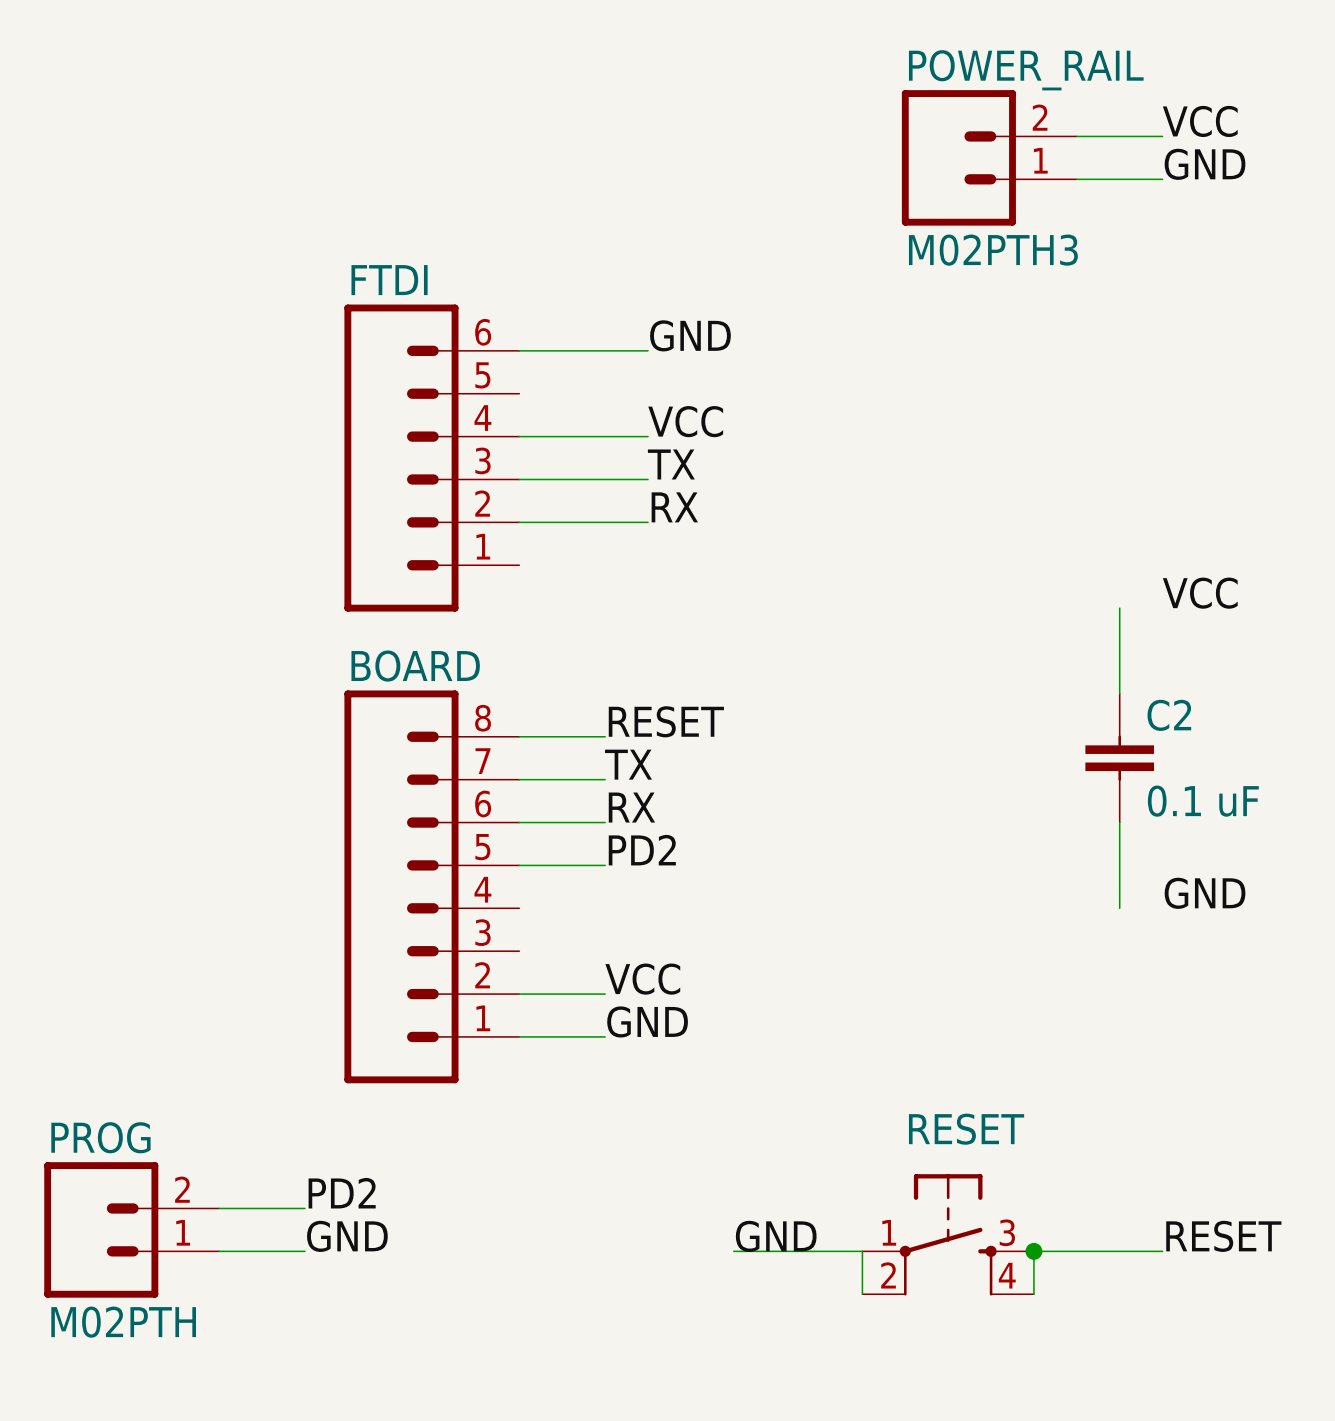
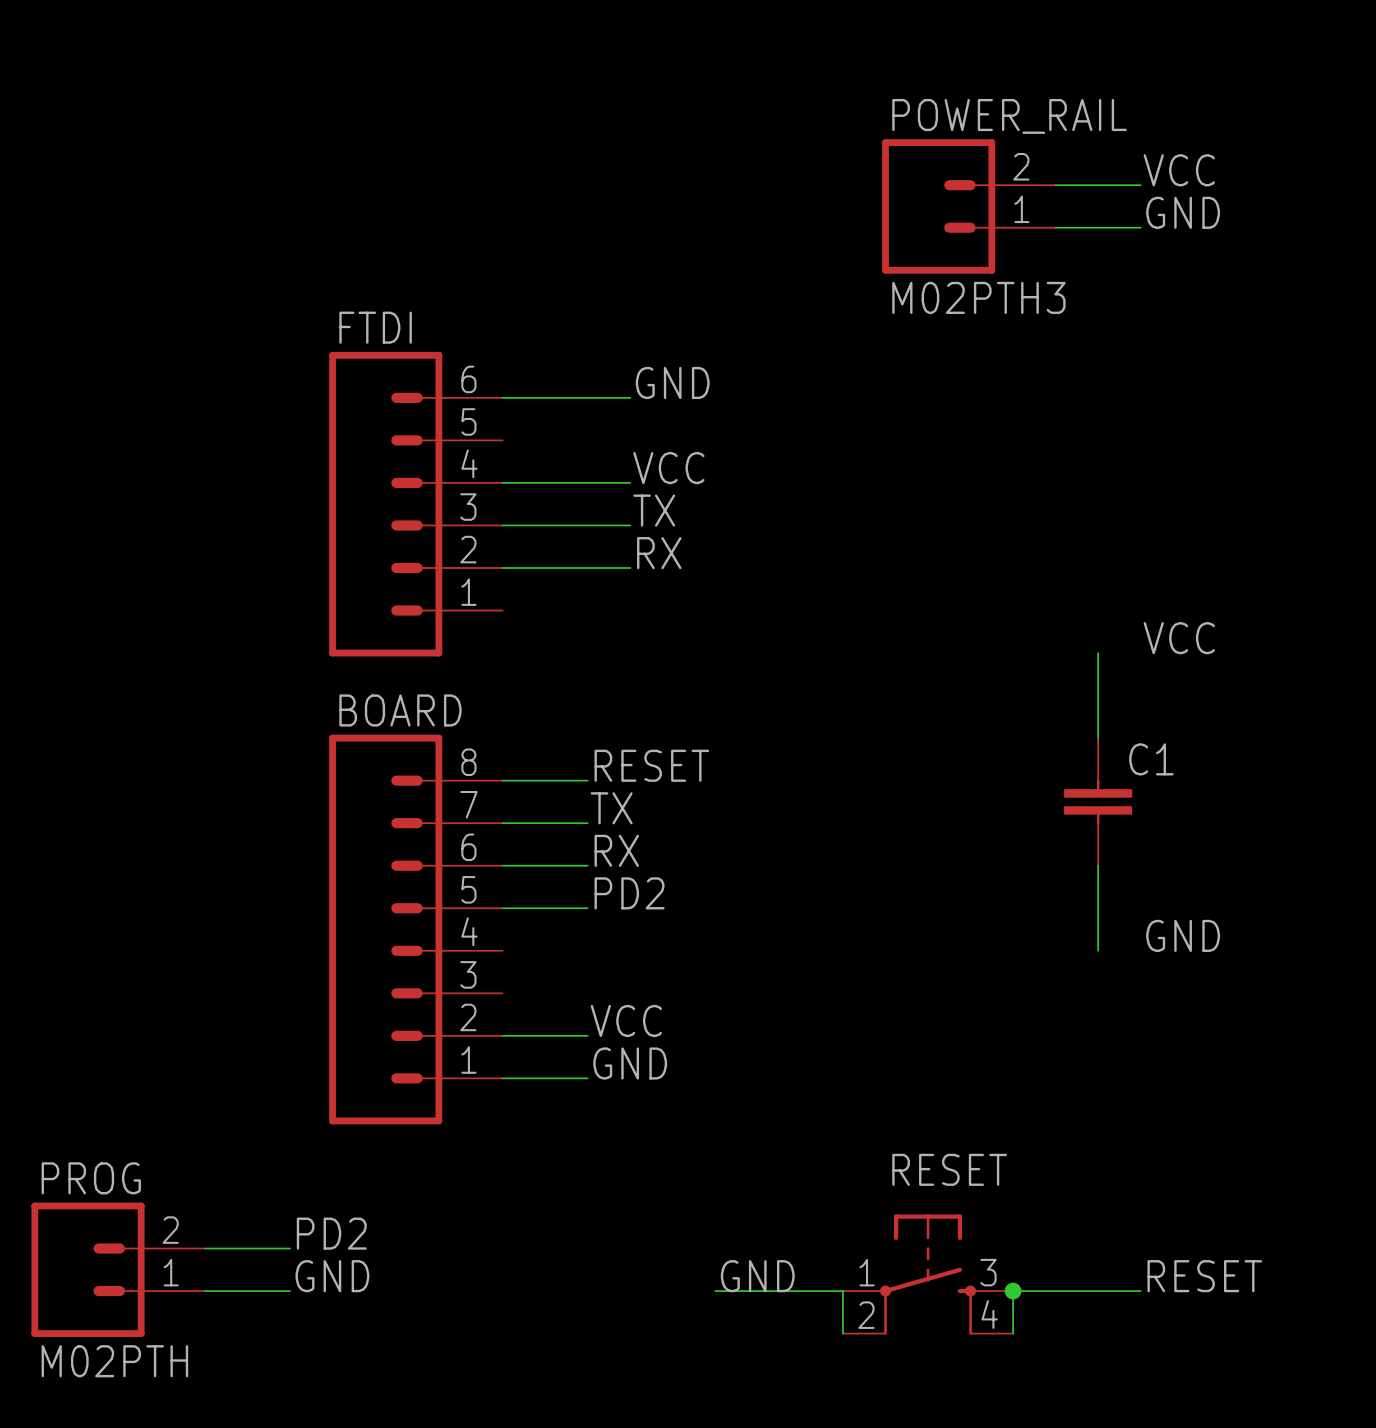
C2 name: C2 (1169, 715) -> C1 (1151, 759)
C2 value: 0.1 uF (1203, 801) -> none

